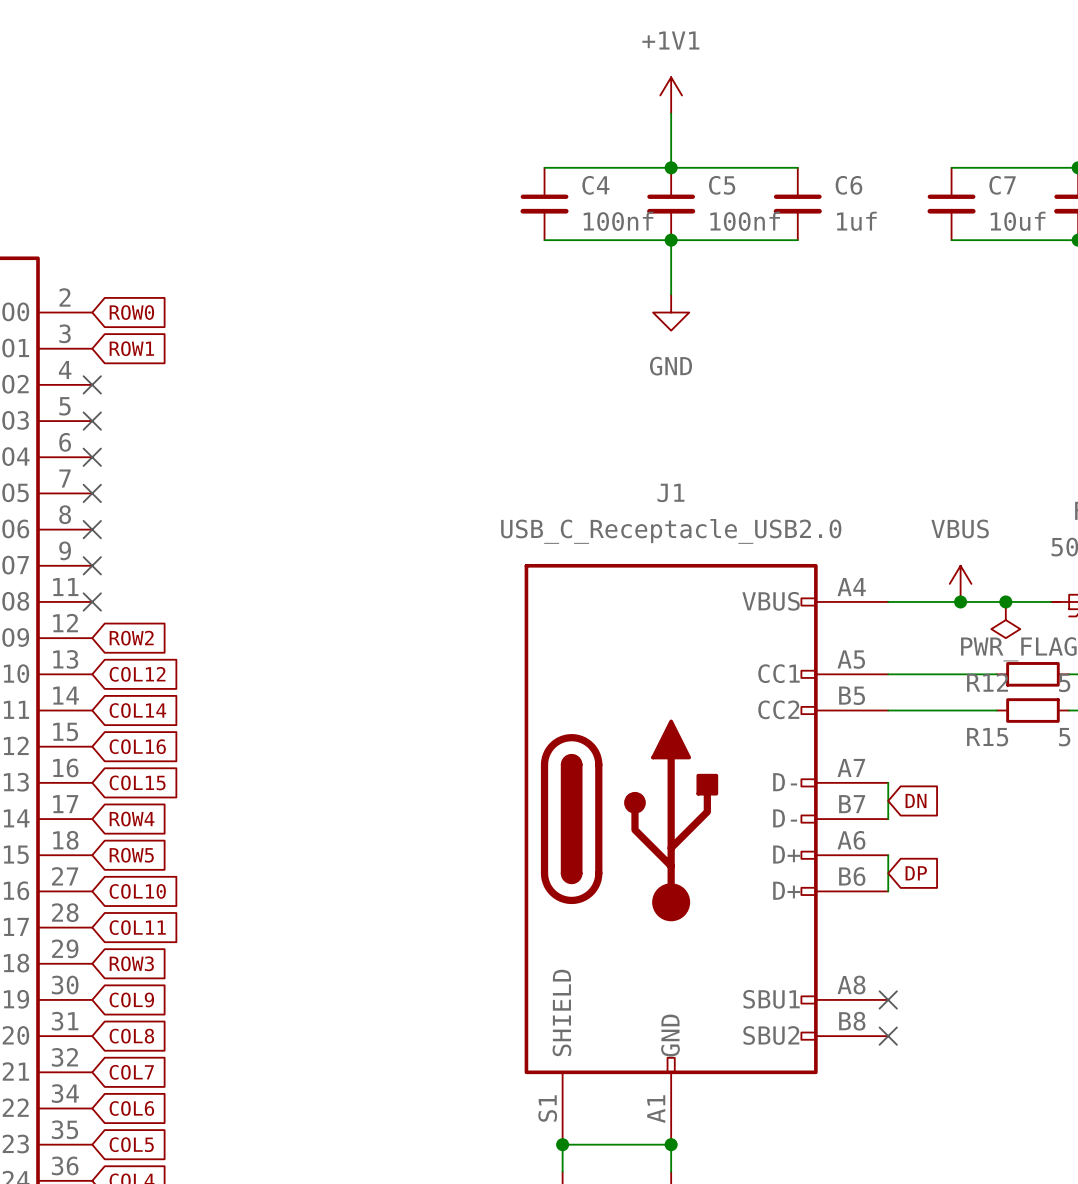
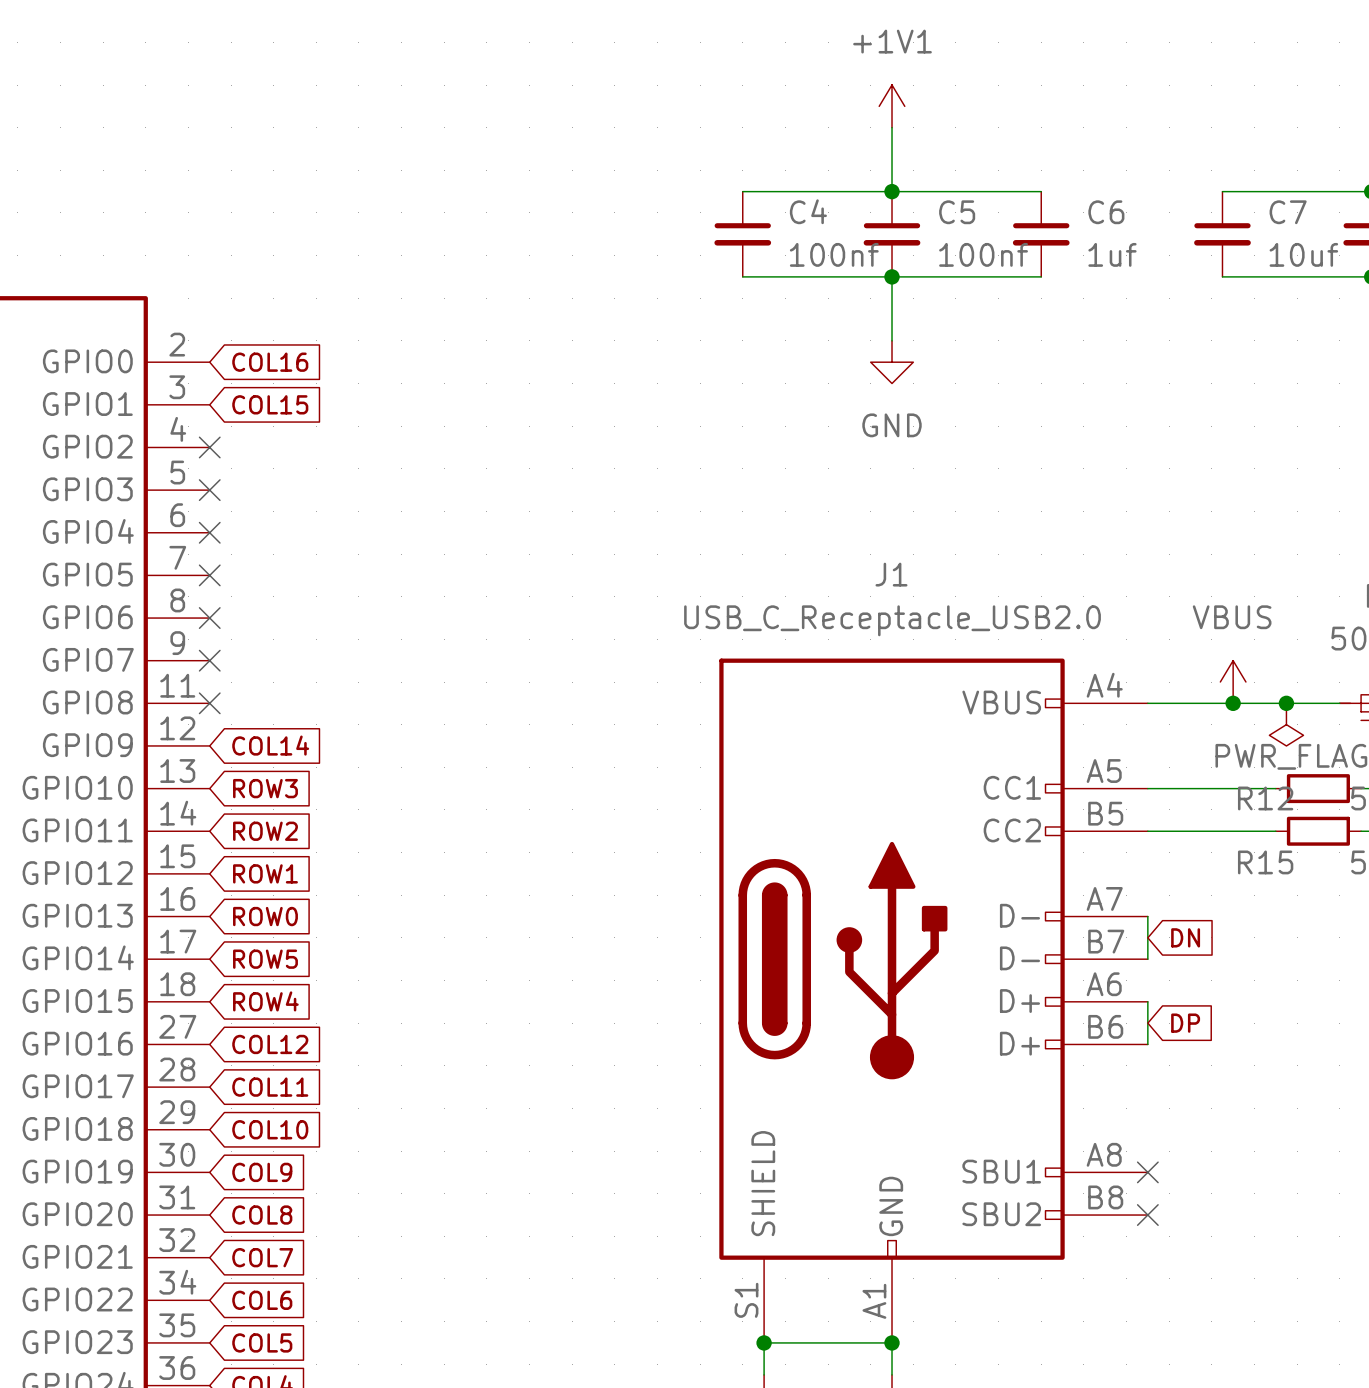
global label: ROW0 (131, 312) -> COL16 (270, 362)
global label: ROW1 (131, 348) -> COL15 (270, 404)
global label: ROW2 (131, 638) -> COL14 (270, 745)
global label: COL12 (137, 674) -> ROW3 (265, 788)
global label: COL14 (137, 710) -> ROW2 (265, 831)
global label: COL16 (137, 746) -> ROW1 (265, 873)
global label: COL15 (137, 782) -> ROW0 (265, 916)
global label: ROW4 (132, 819) -> ROW5 (265, 959)
global label: ROW5 (131, 855) -> ROW4 (265, 1001)
global label: COL10 (137, 891) -> COL12 (270, 1044)
global label: ROW3 (131, 963) -> COL10 (270, 1129)

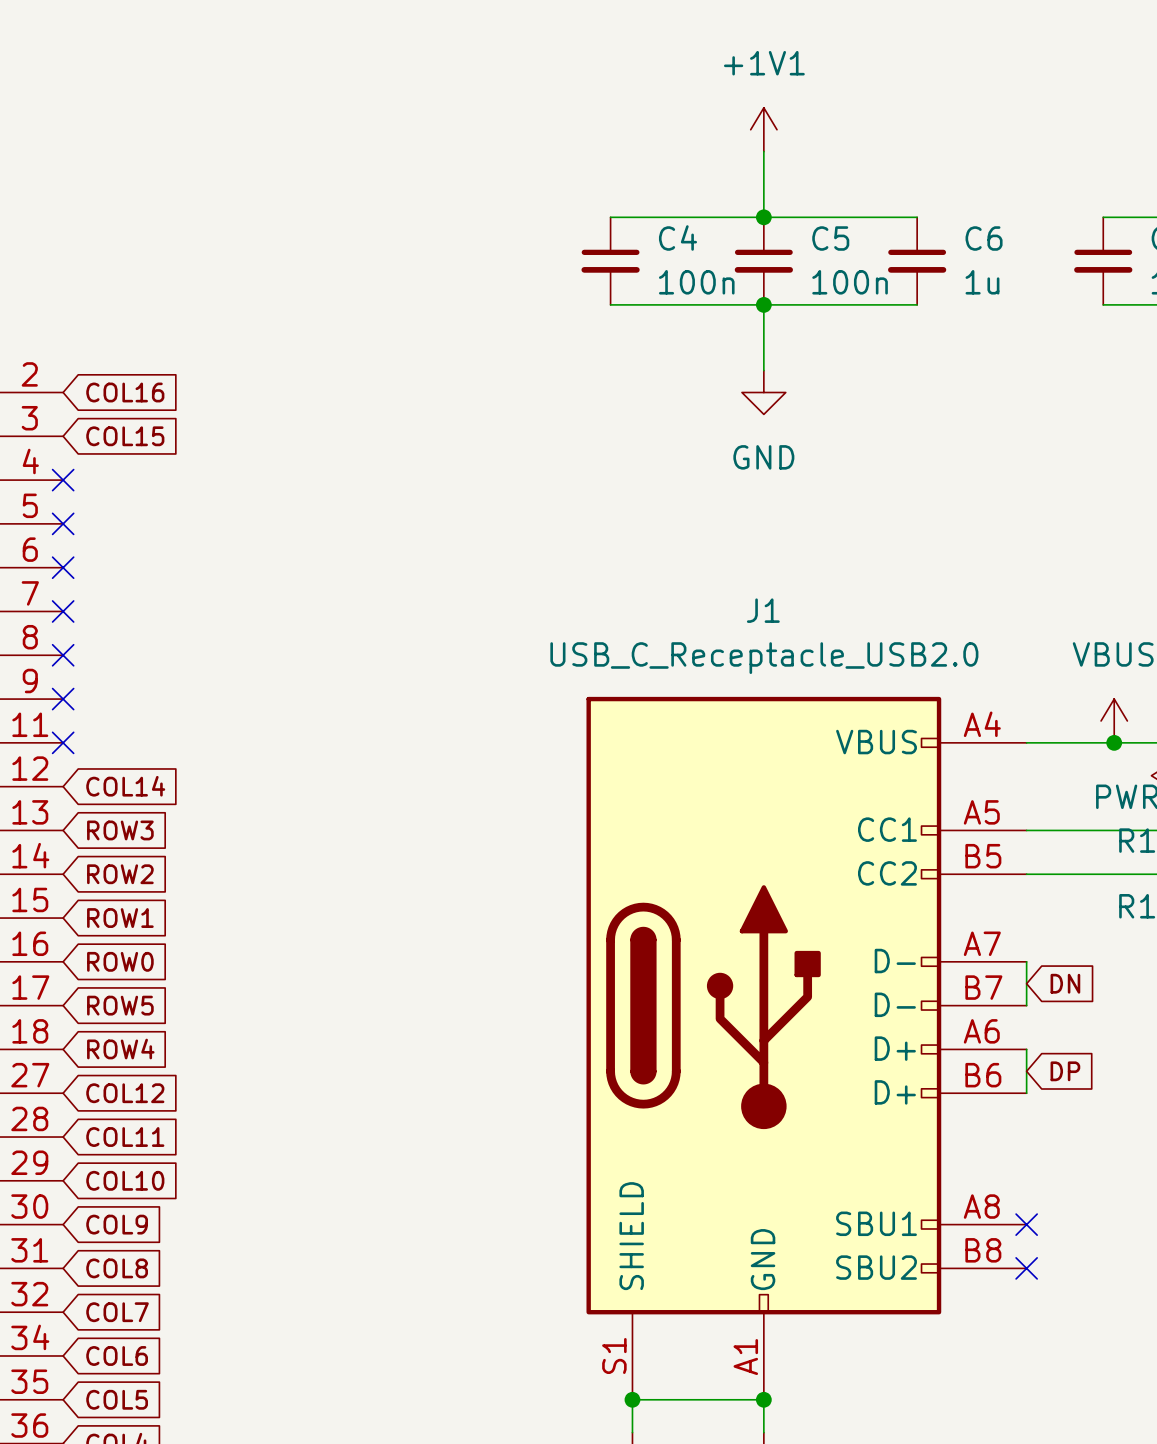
C4 value: 100nf (834, 254) -> 100n (696, 282)
C5 value: 100nf (983, 254) -> 100n (850, 282)
C6 value: 1uf (1112, 254) -> 1u (982, 282)

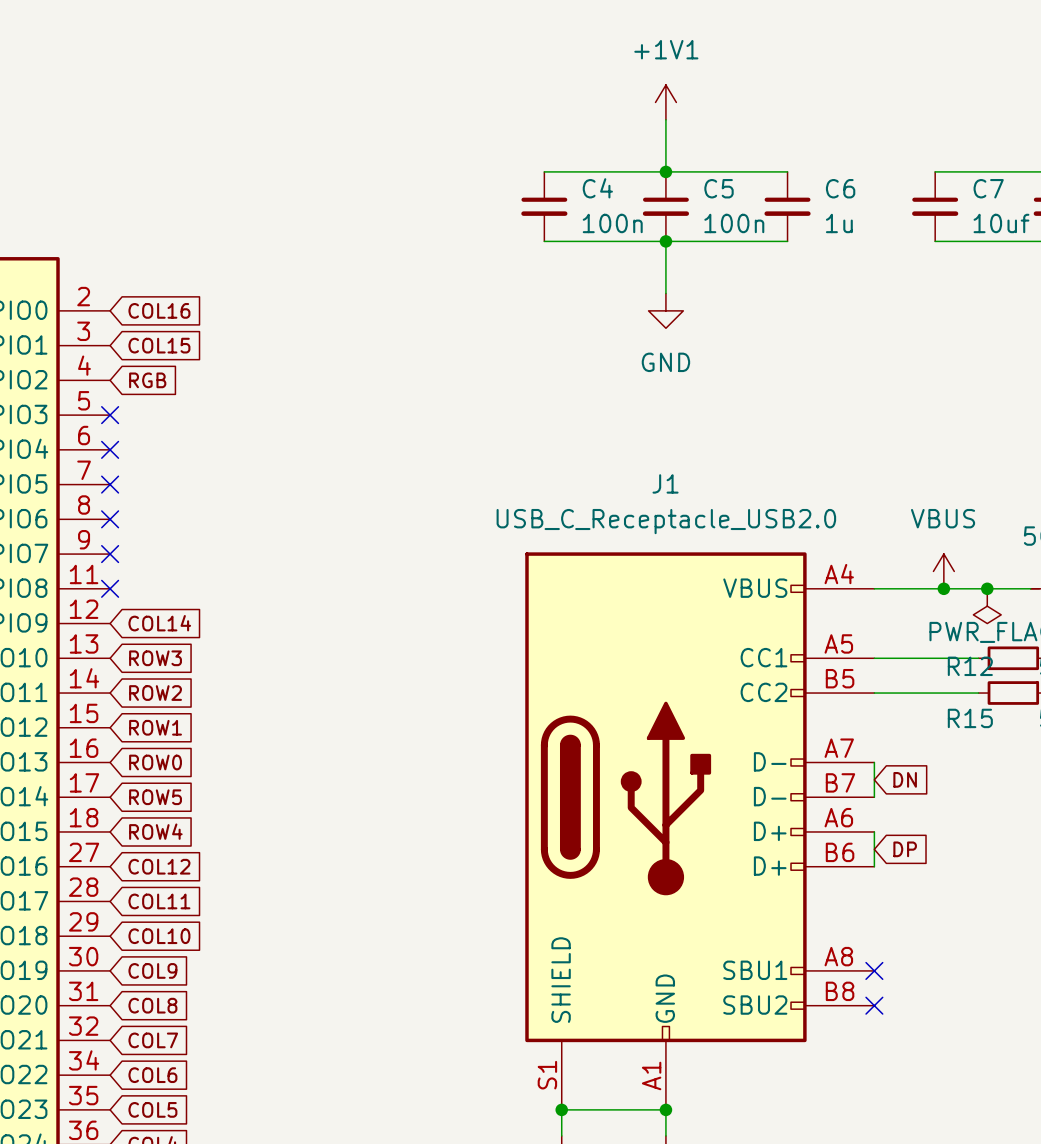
no-connect mark: (63, 480) -> none
global label: none -> RGB (147, 380)

